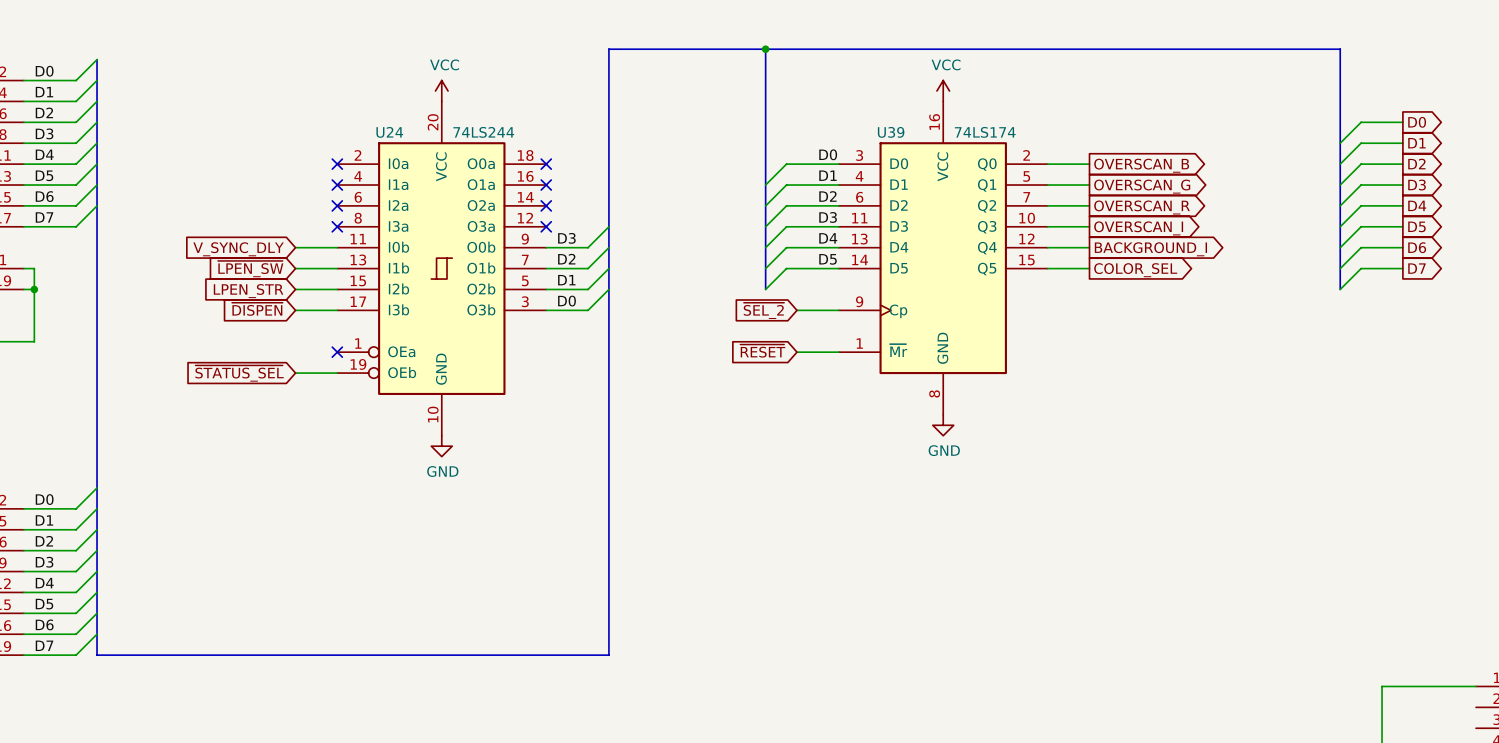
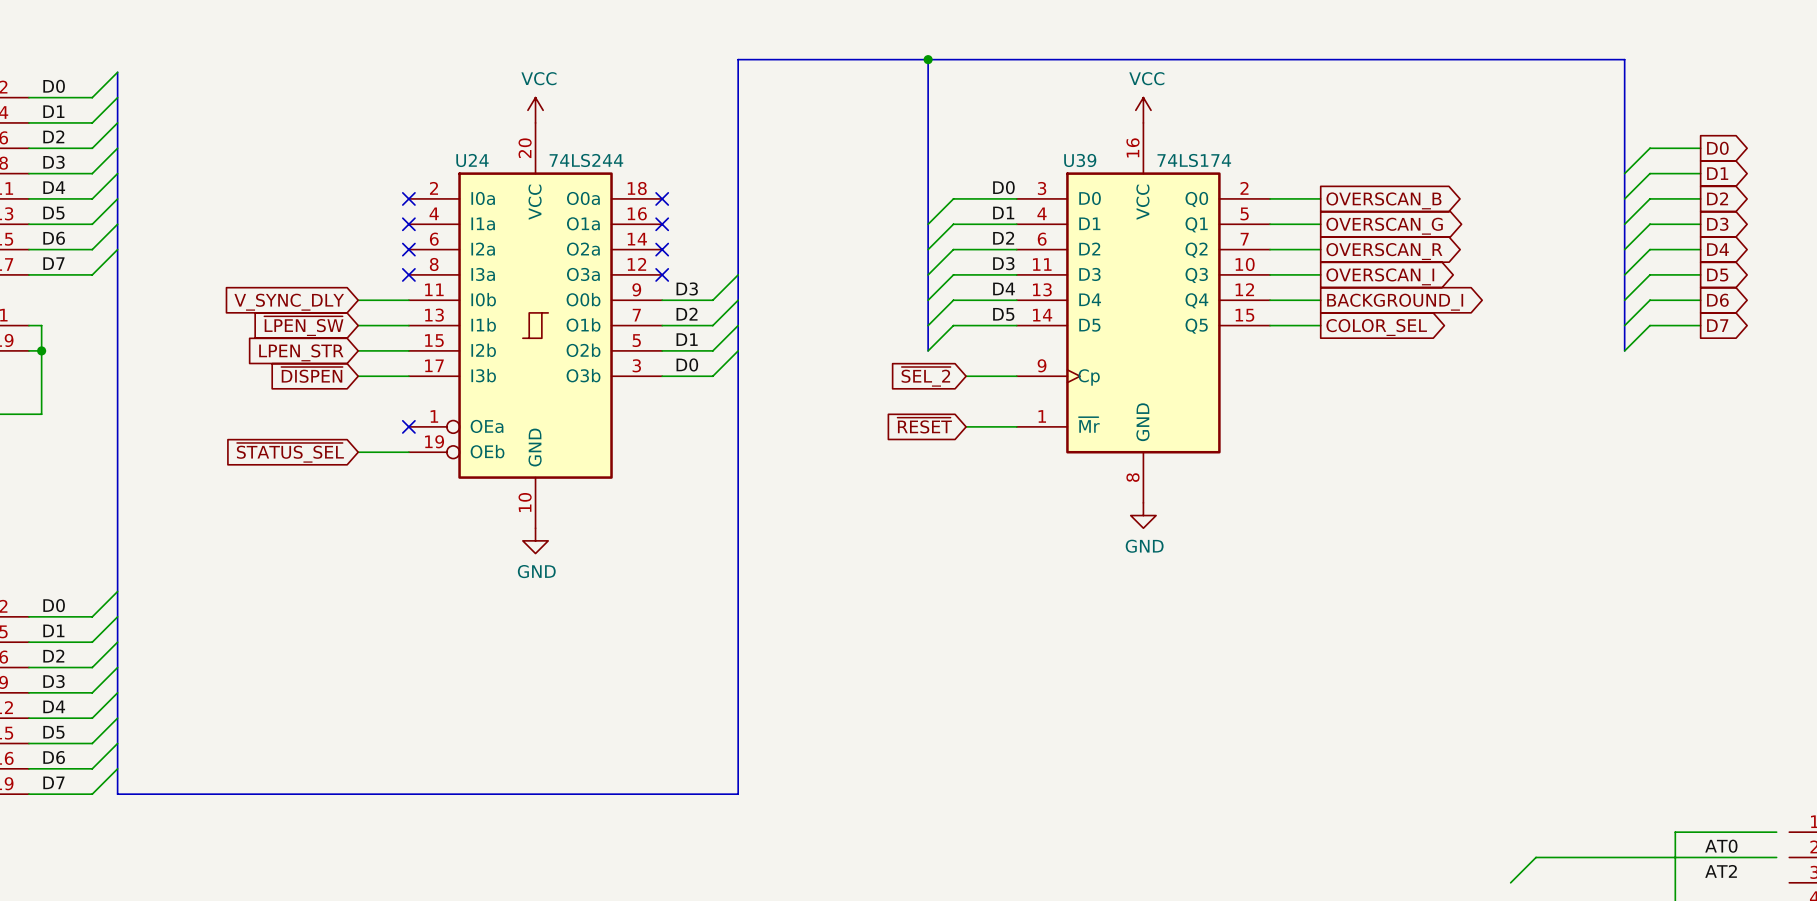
wire: (1465, 686) (1476, 686) -> none
label: none -> AT0 (1721, 846)
wire: none -> (1776, 857) (1536, 857) (1510, 882)
label: none -> AT2 (1721, 871)

